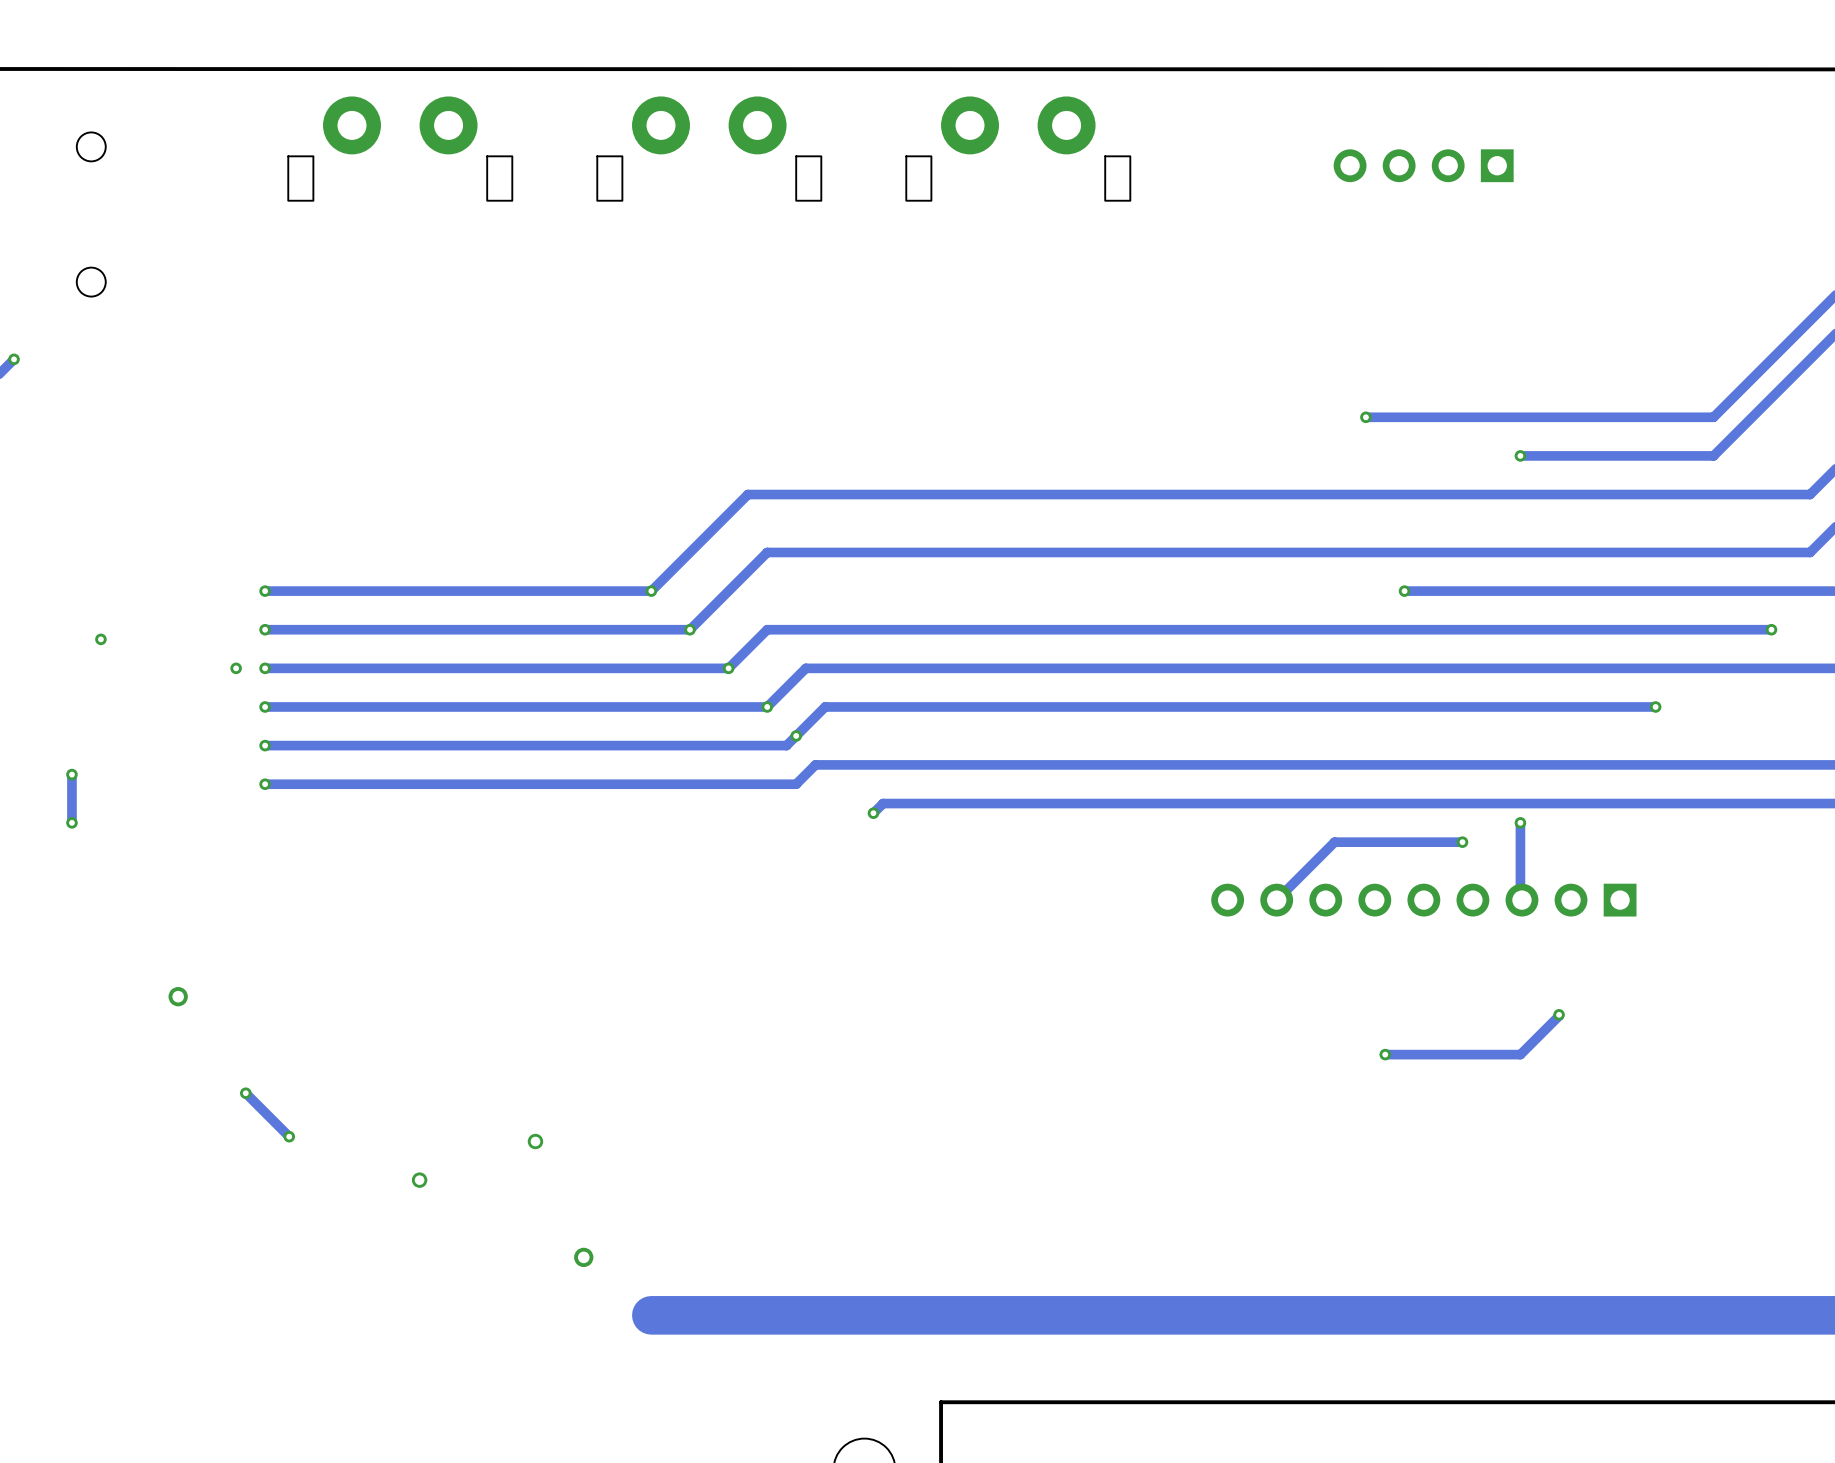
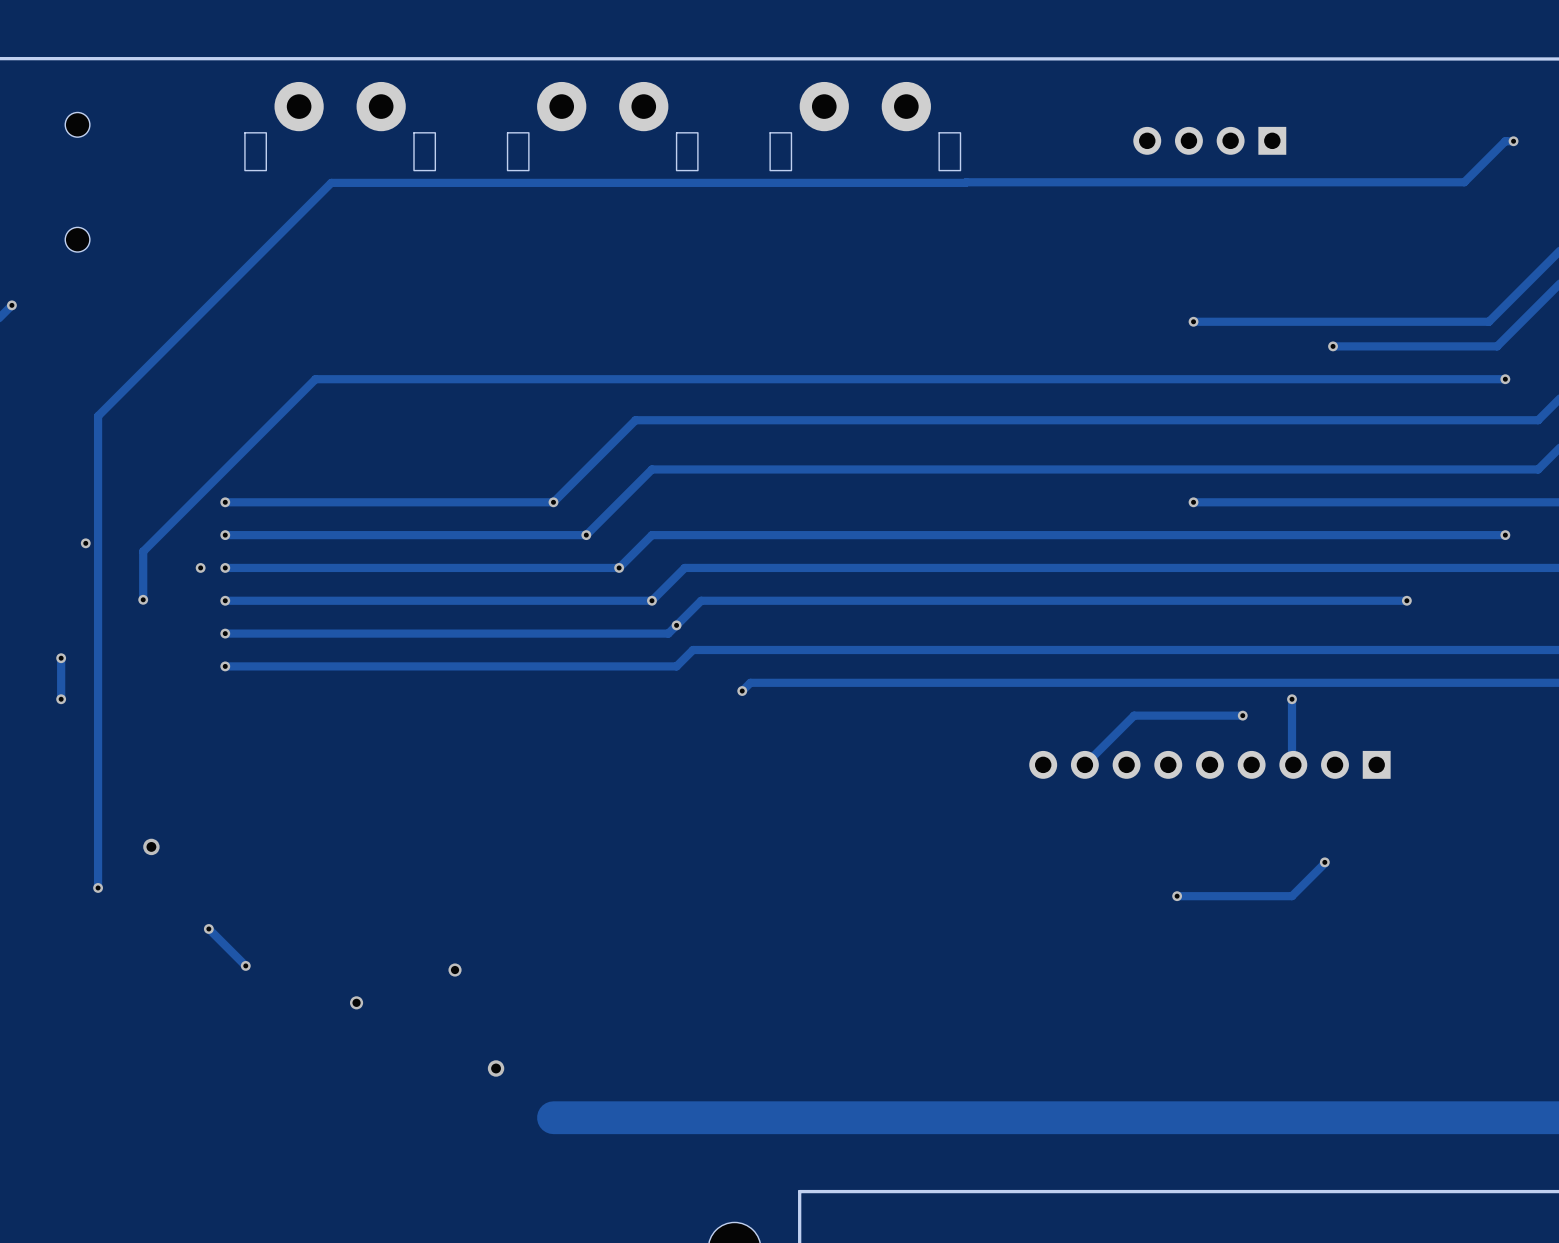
track: none -> (1513, 141) (1505, 141) (1464, 182) (331, 182) (98, 416) (98, 887)
via: none -> (1513, 141)
track: (1752, 378) (1713, 417) (1365, 417) -> (1488, 321) (1193, 321)
track: (1761, 407) (1713, 455) (1520, 455) -> (1497, 346) (1333, 346)
via position: (1365, 417) -> (1193, 321)
track: none -> (1505, 379) (315, 379) (143, 551) (143, 599)
via: none -> (1505, 379)
via position: (1520, 455) -> (1333, 346)
via: none -> (143, 599)
via: none -> (98, 887)

